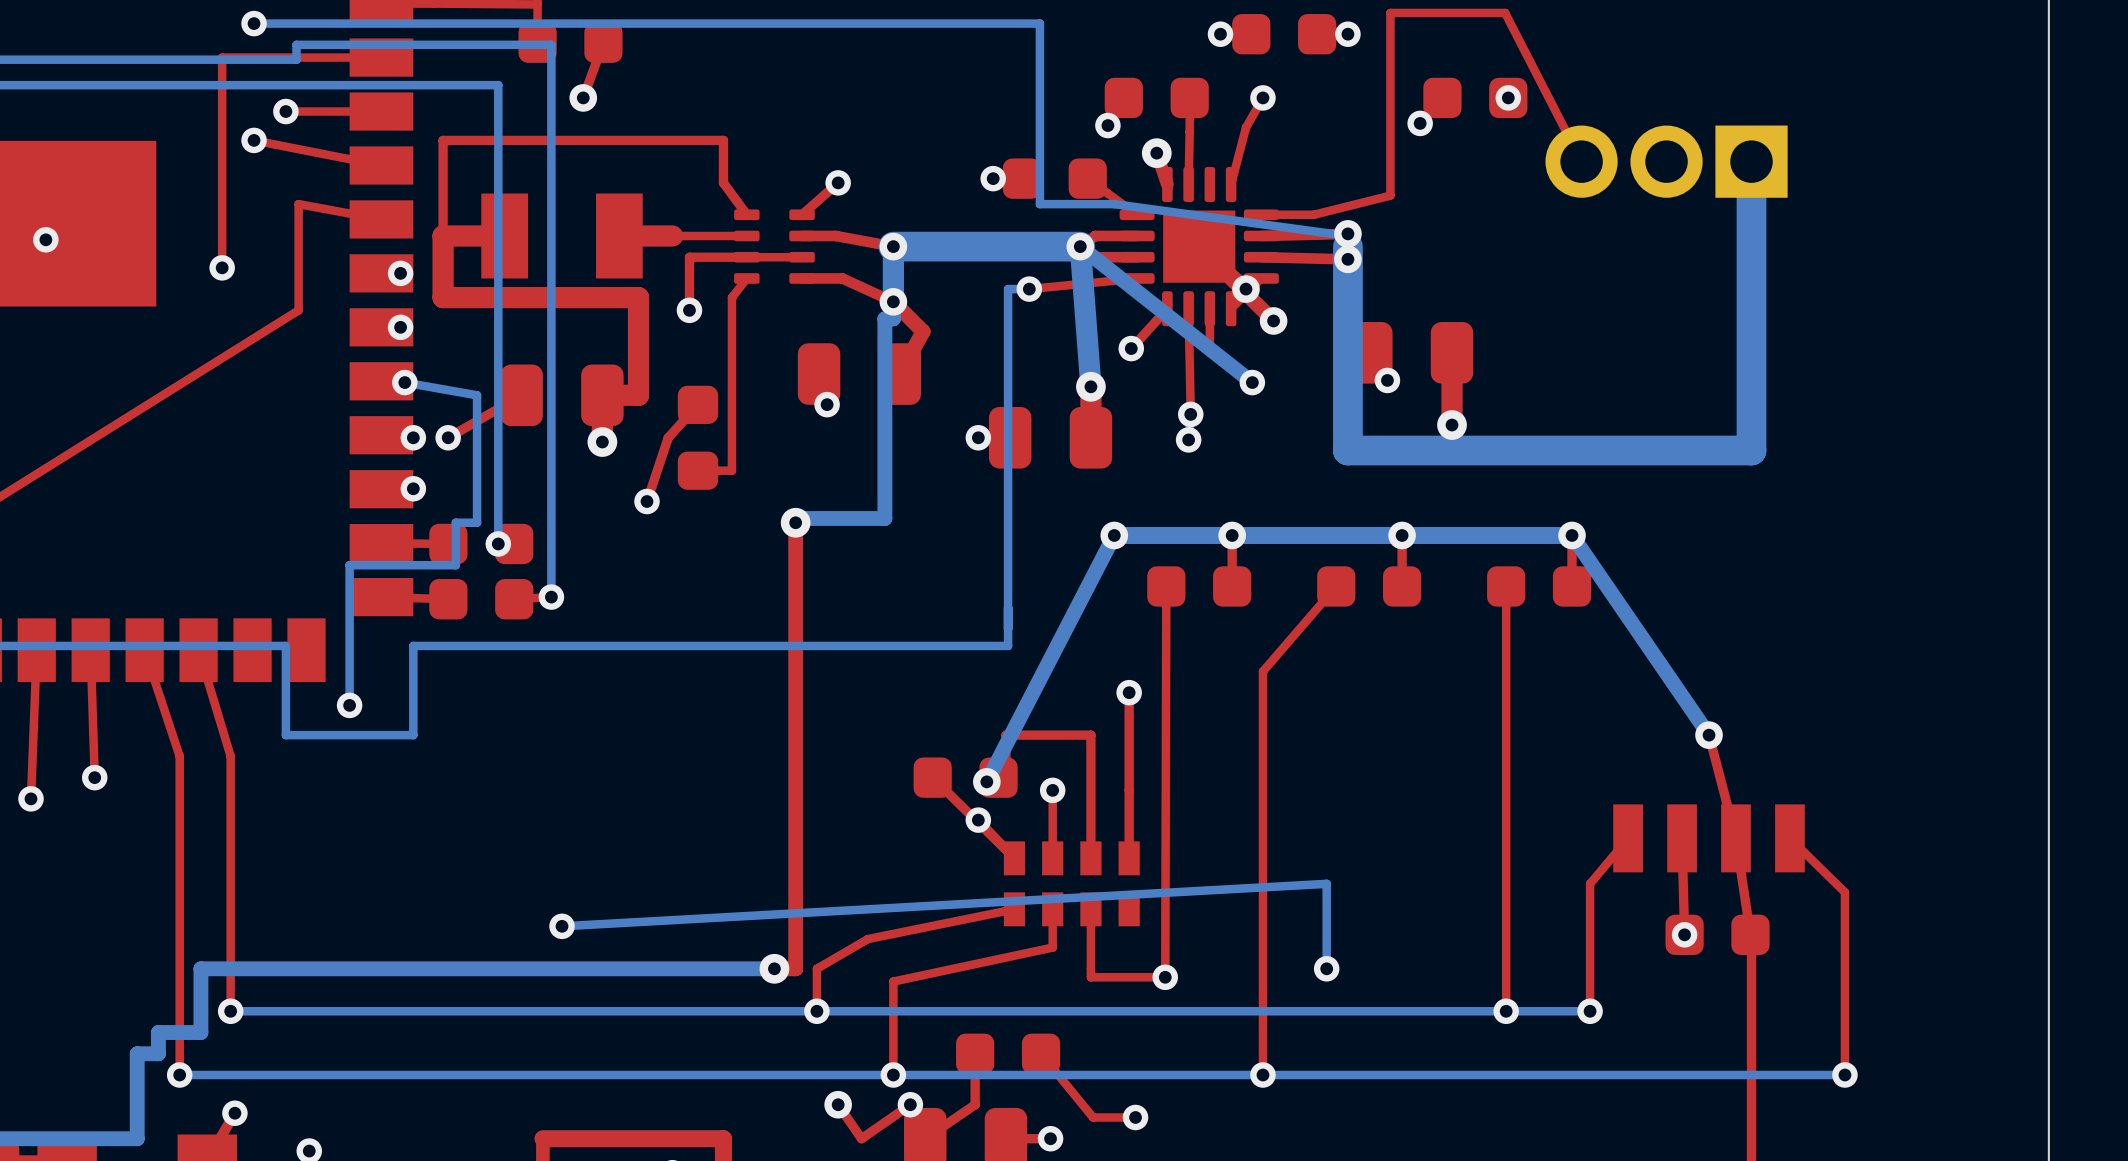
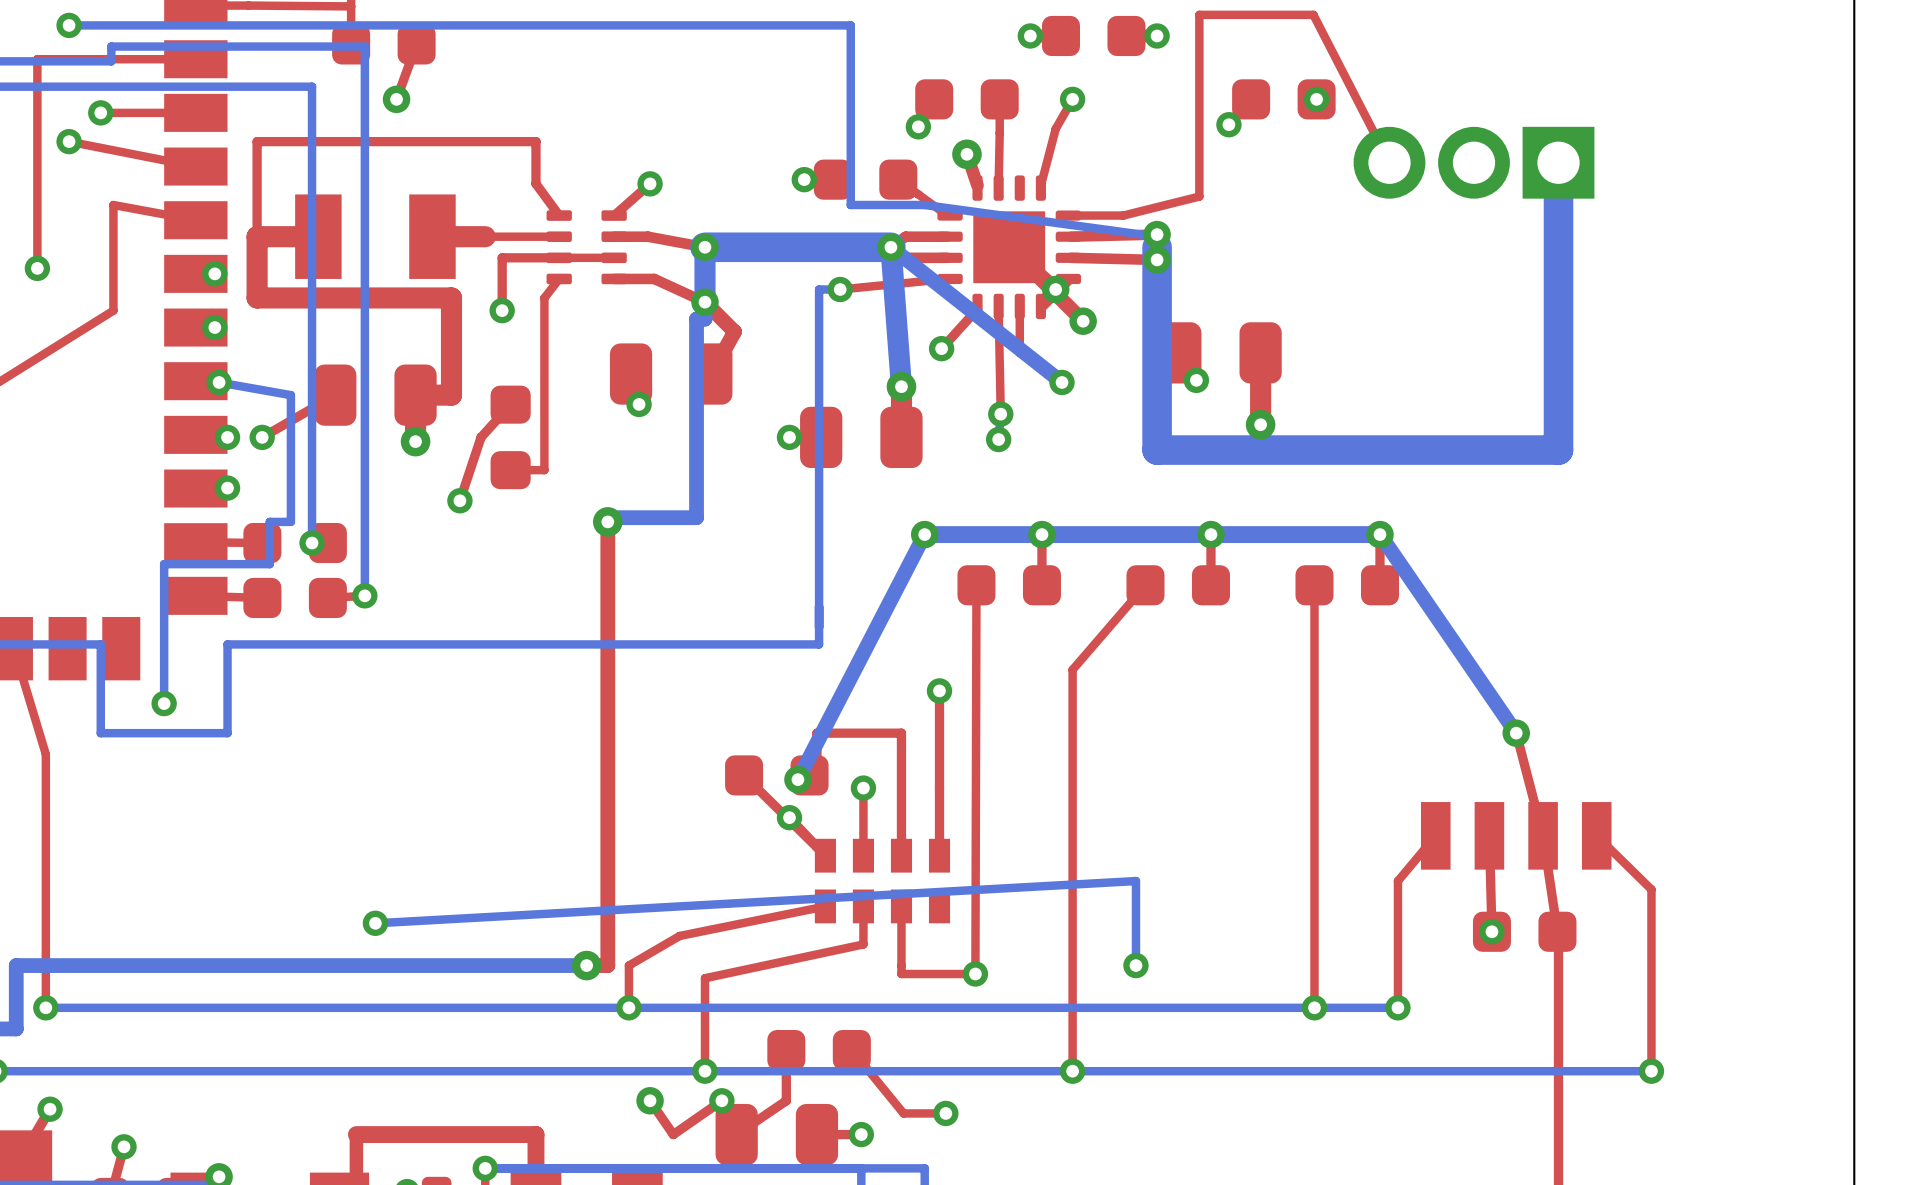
part footprint: [1119, 166, 1279, 327] -> [937, 175, 1082, 320]

